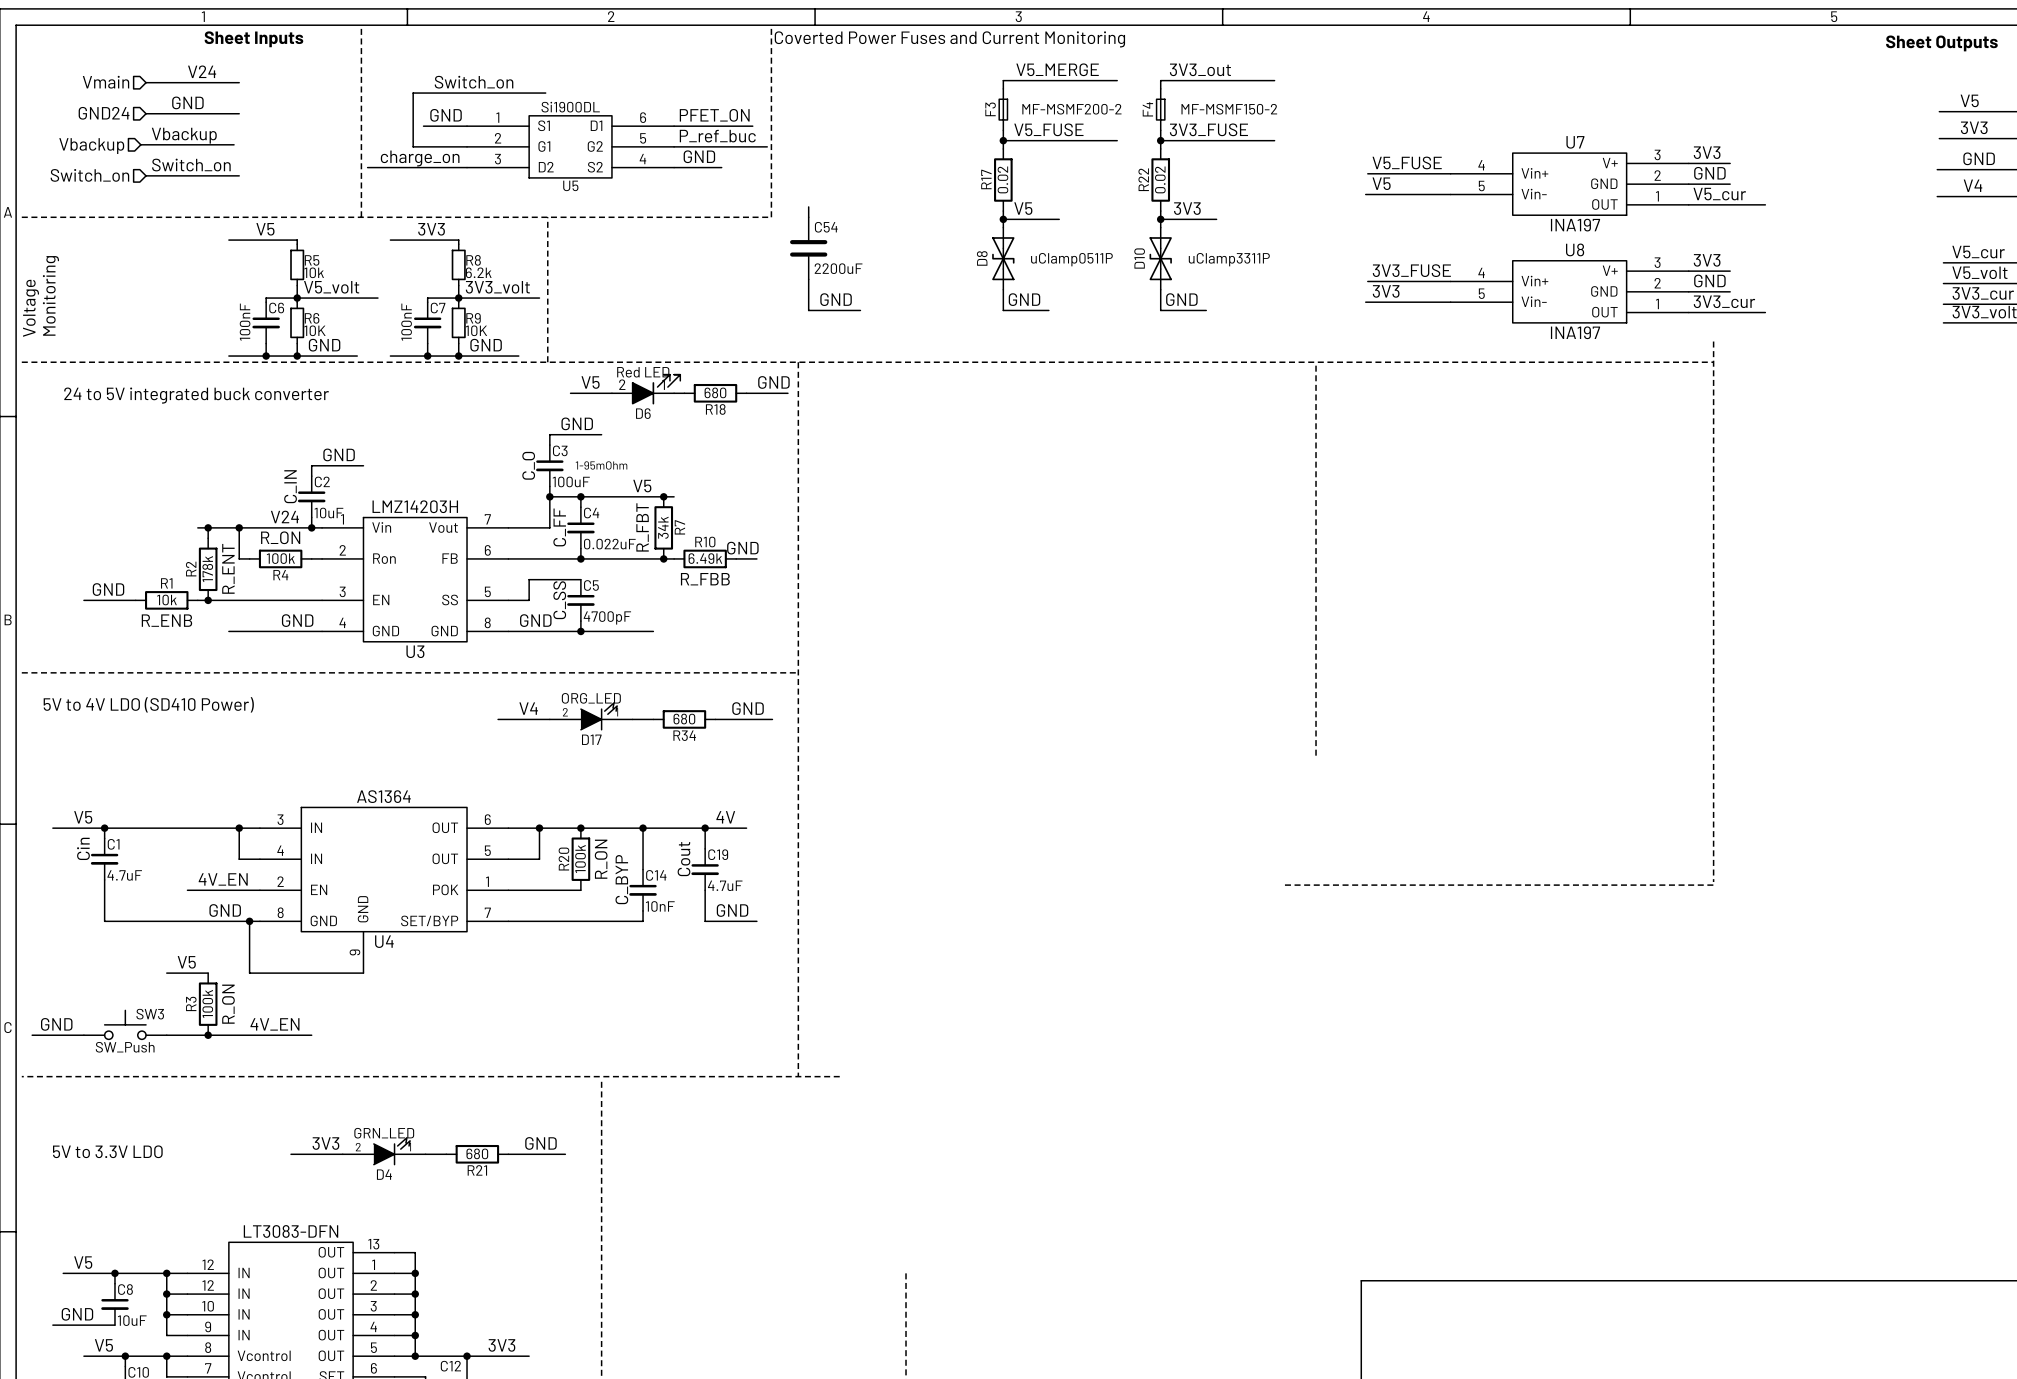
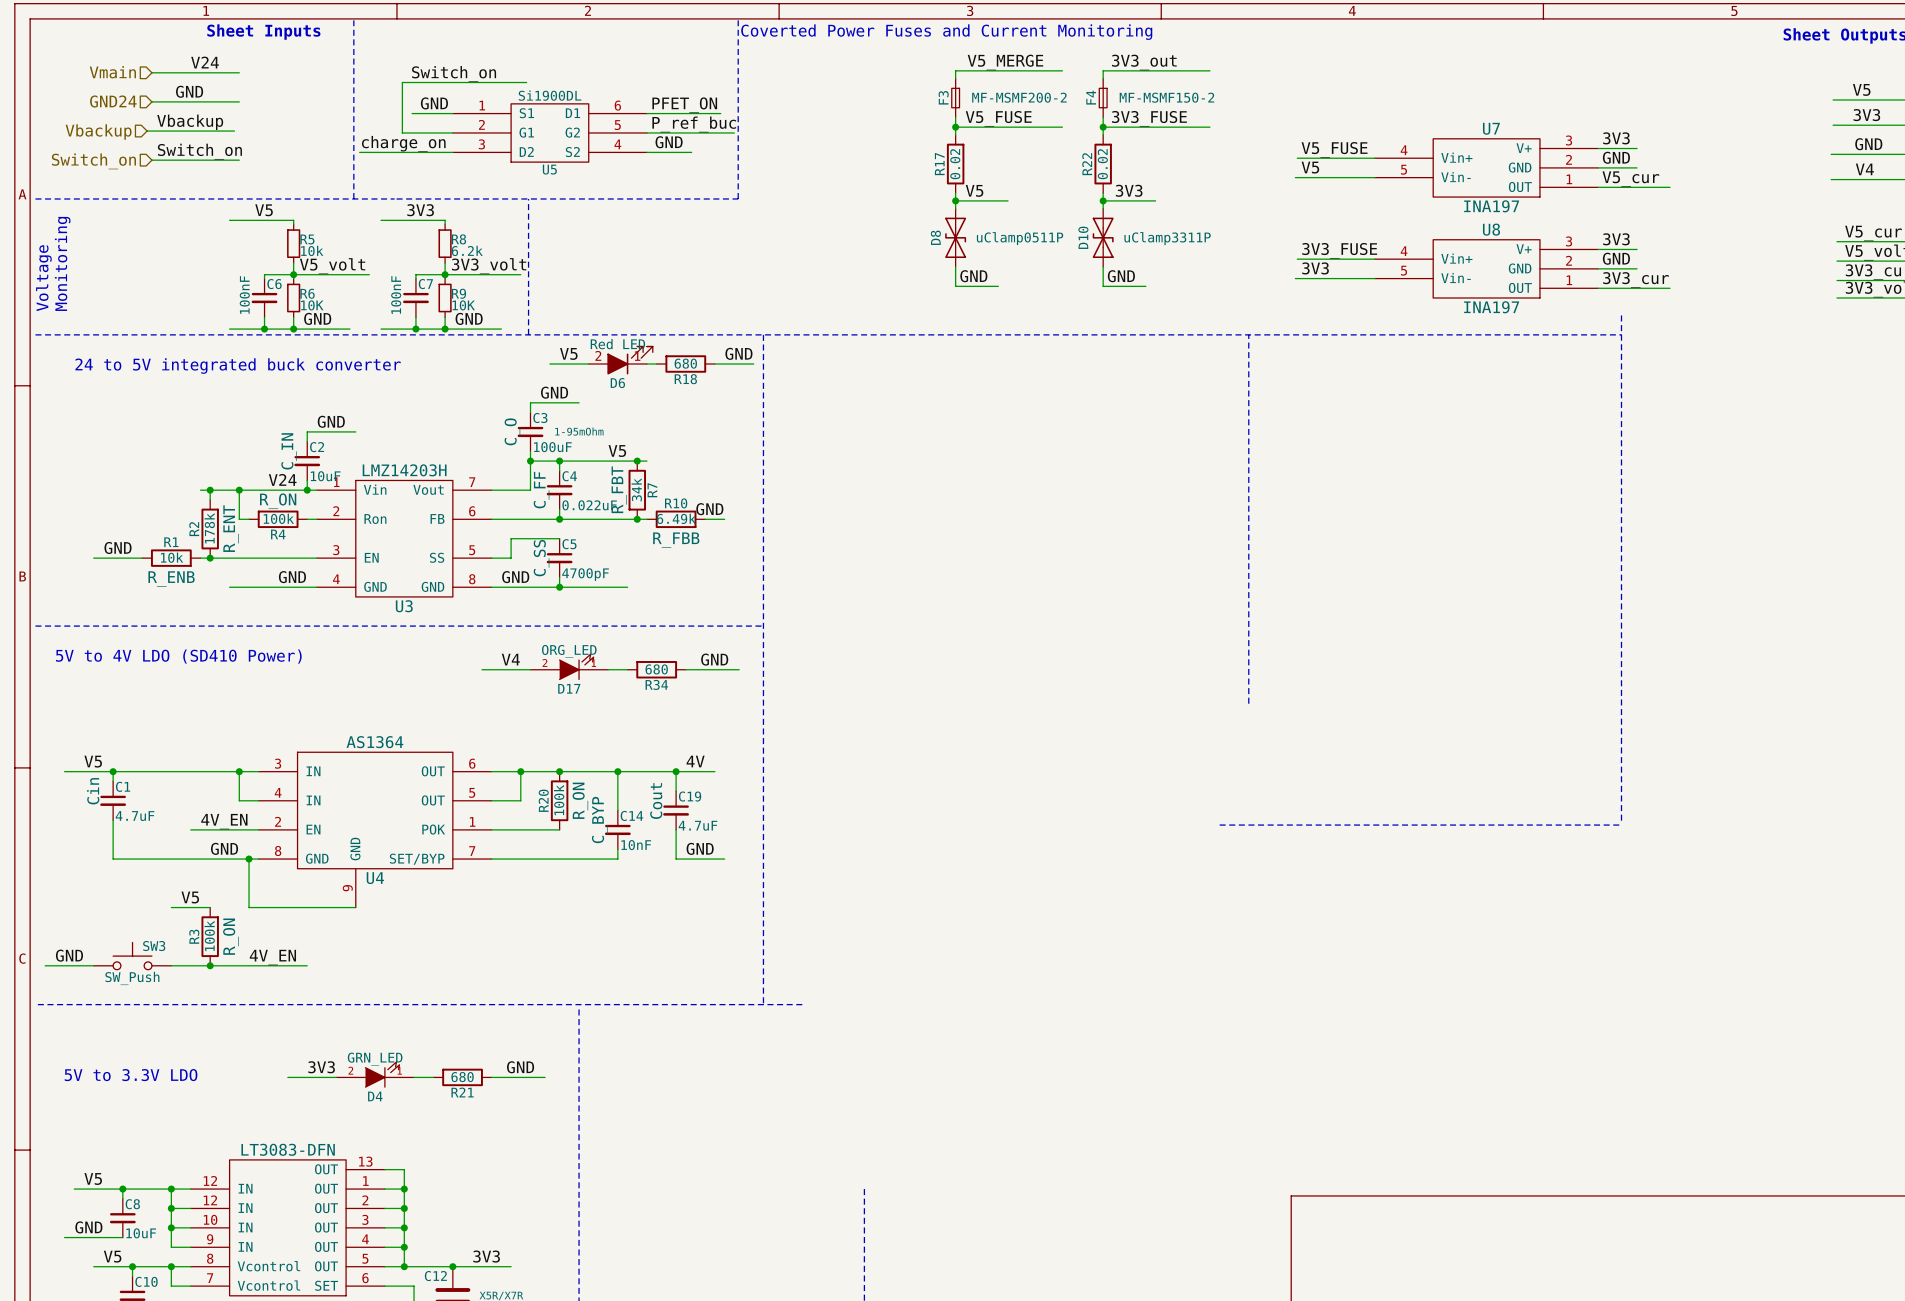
wire: (808, 206) (808, 217) -> none
C54: 2200uF (808, 248) -> none
wire: (808, 279) (808, 310) (860, 310) -> none
label: GND (836, 299) -> none

